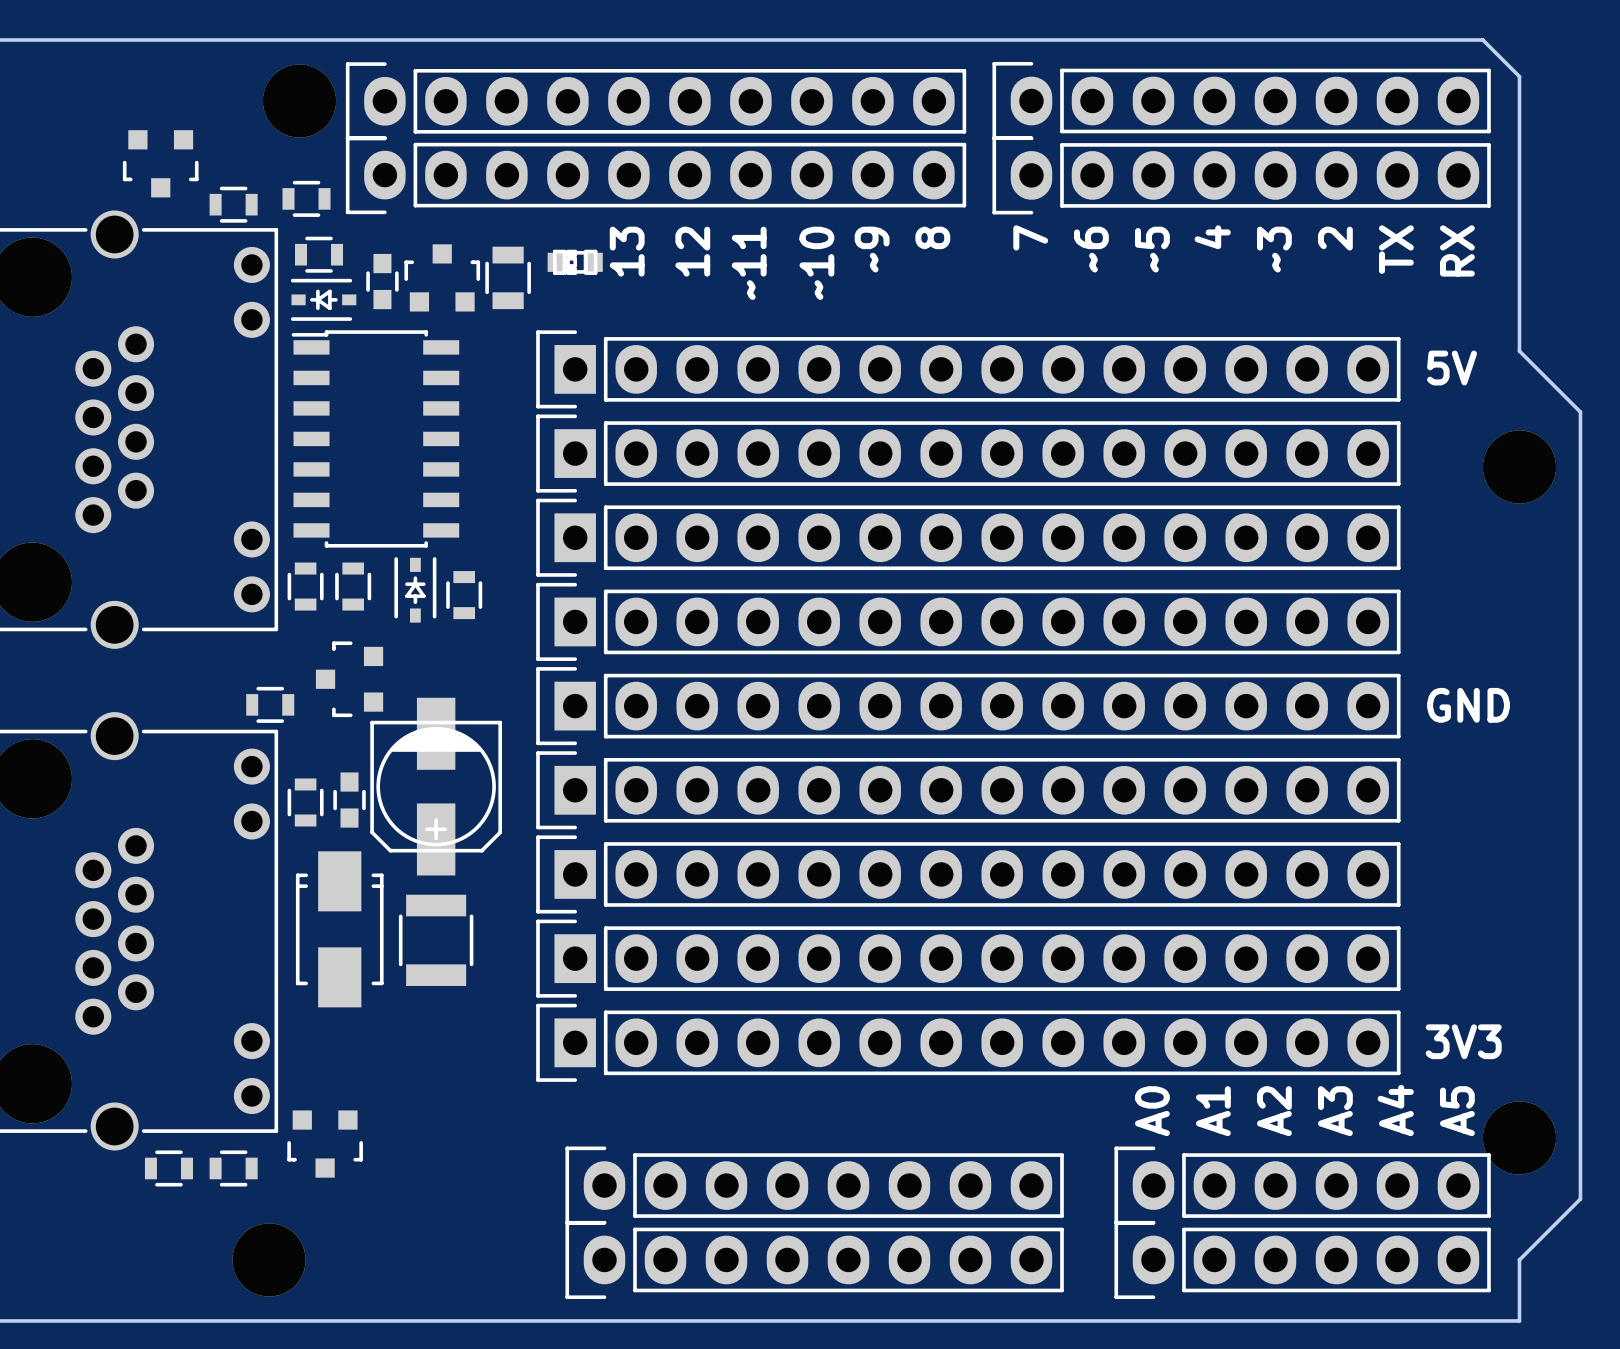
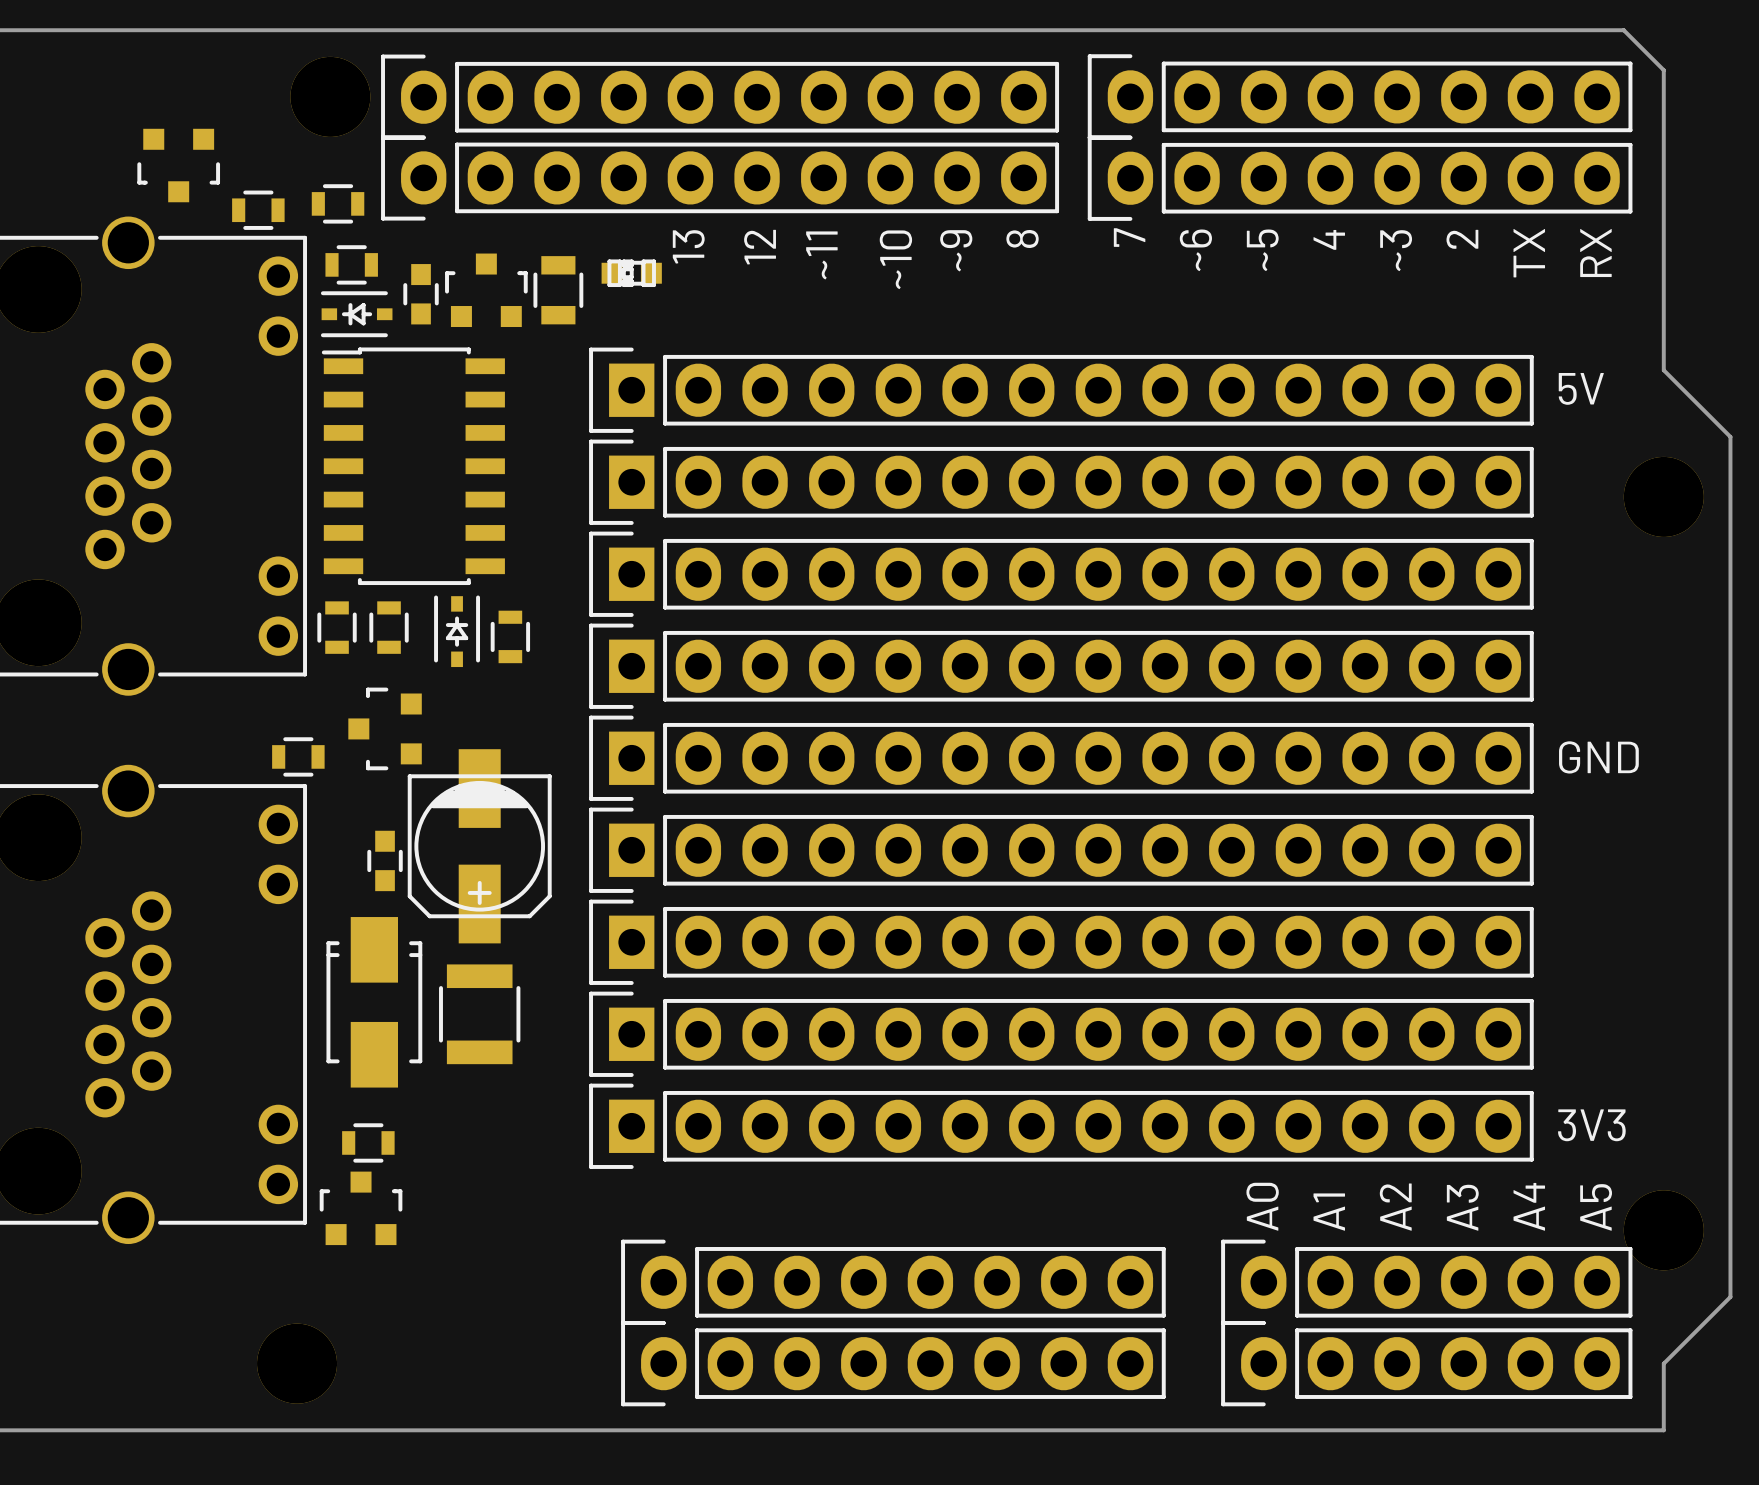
part: (305, 802) -> none
part: none -> (368, 1142)
part rotation: 0° (325, 1144) -> 180° (361, 1208)
part: (168, 1168) -> none
part: (233, 1168) -> none

